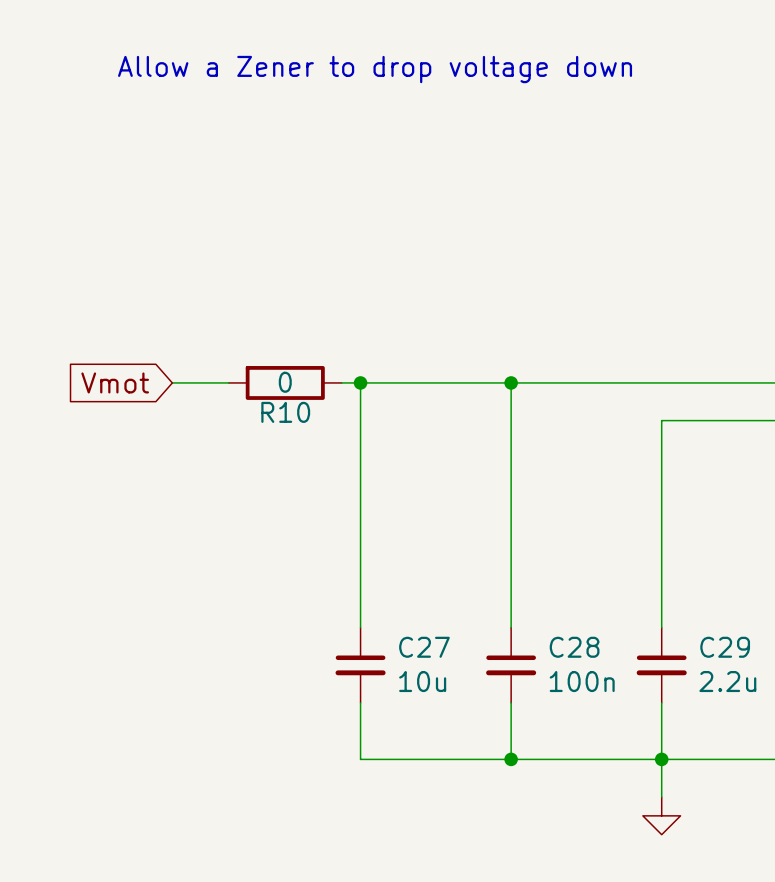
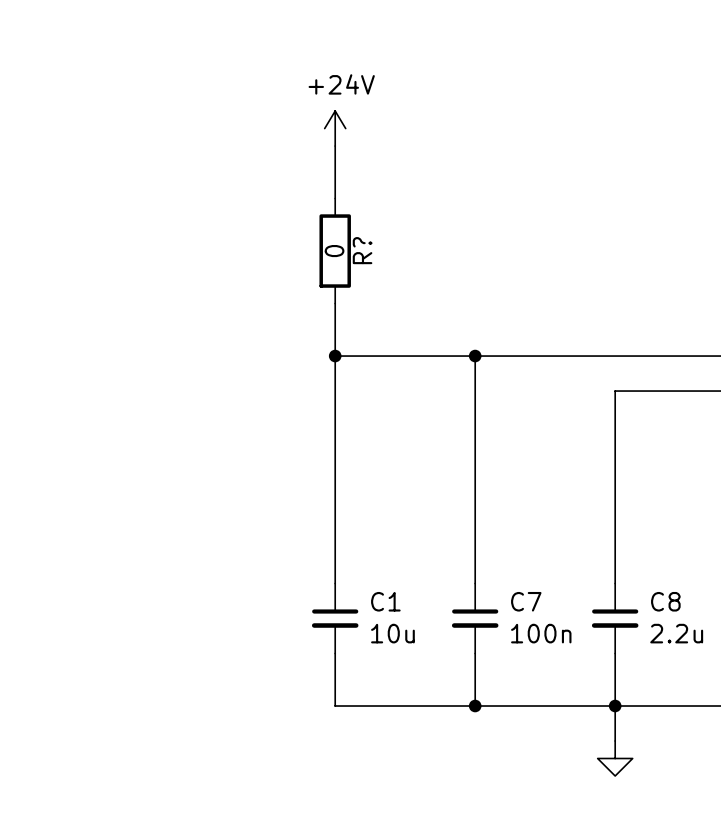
text: Allow a Zener to drop voltage down (375, 69) -> none
power symbol: none -> +24V (335, 128)
wire: none -> (335, 146) (335, 198)
R?: none -> 0 (335, 251)
global label: Vmot (115, 382) -> none
wire: (172, 382) (228, 382) -> none
R10: 0 (285, 382) -> none
wire: (341, 382) (360, 382) -> (335, 303) (335, 356)
C27 name: C27 (424, 647) -> C1 (385, 601)
C28 name: C28 (574, 647) -> C7 (526, 601)
C29 name: C29 (725, 647) -> C8 (665, 601)

